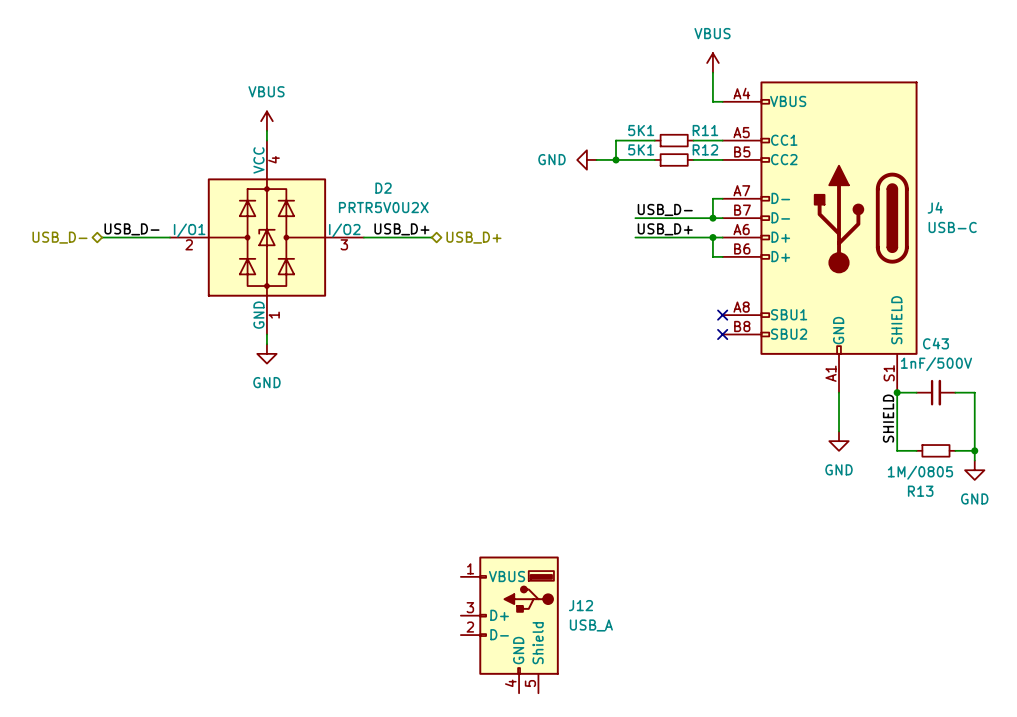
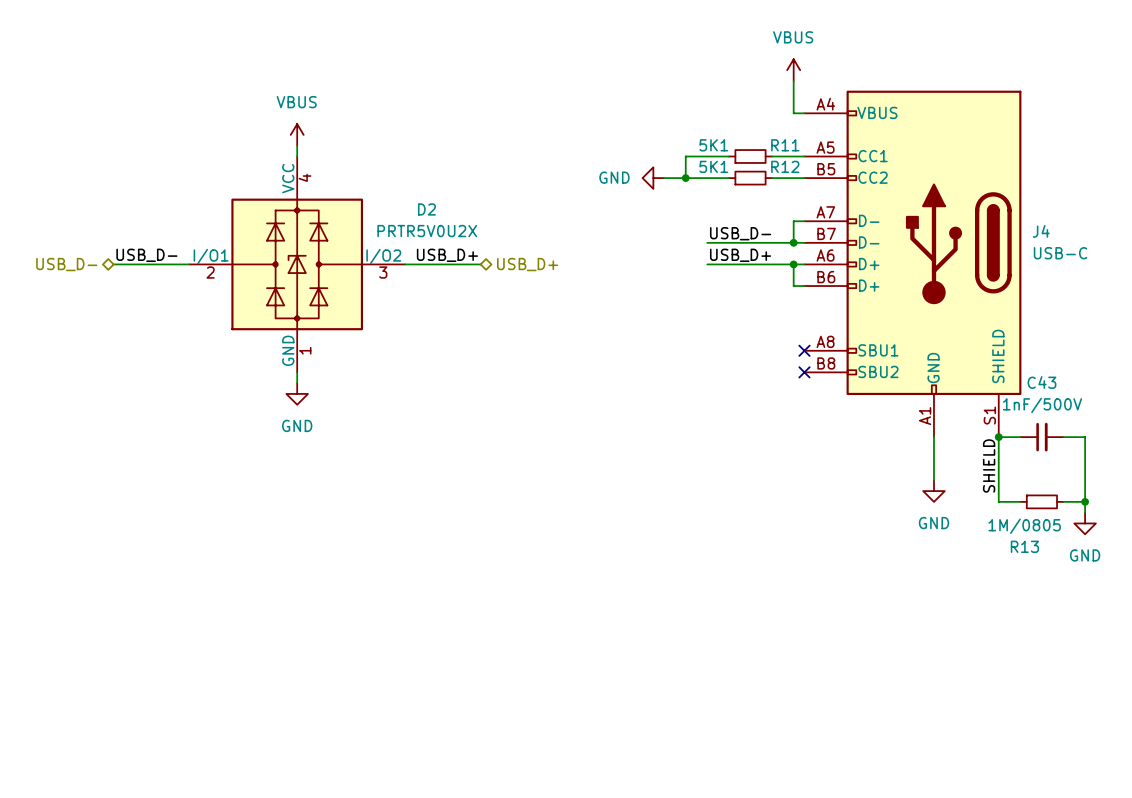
J12: USB_A (509, 624) -> none

